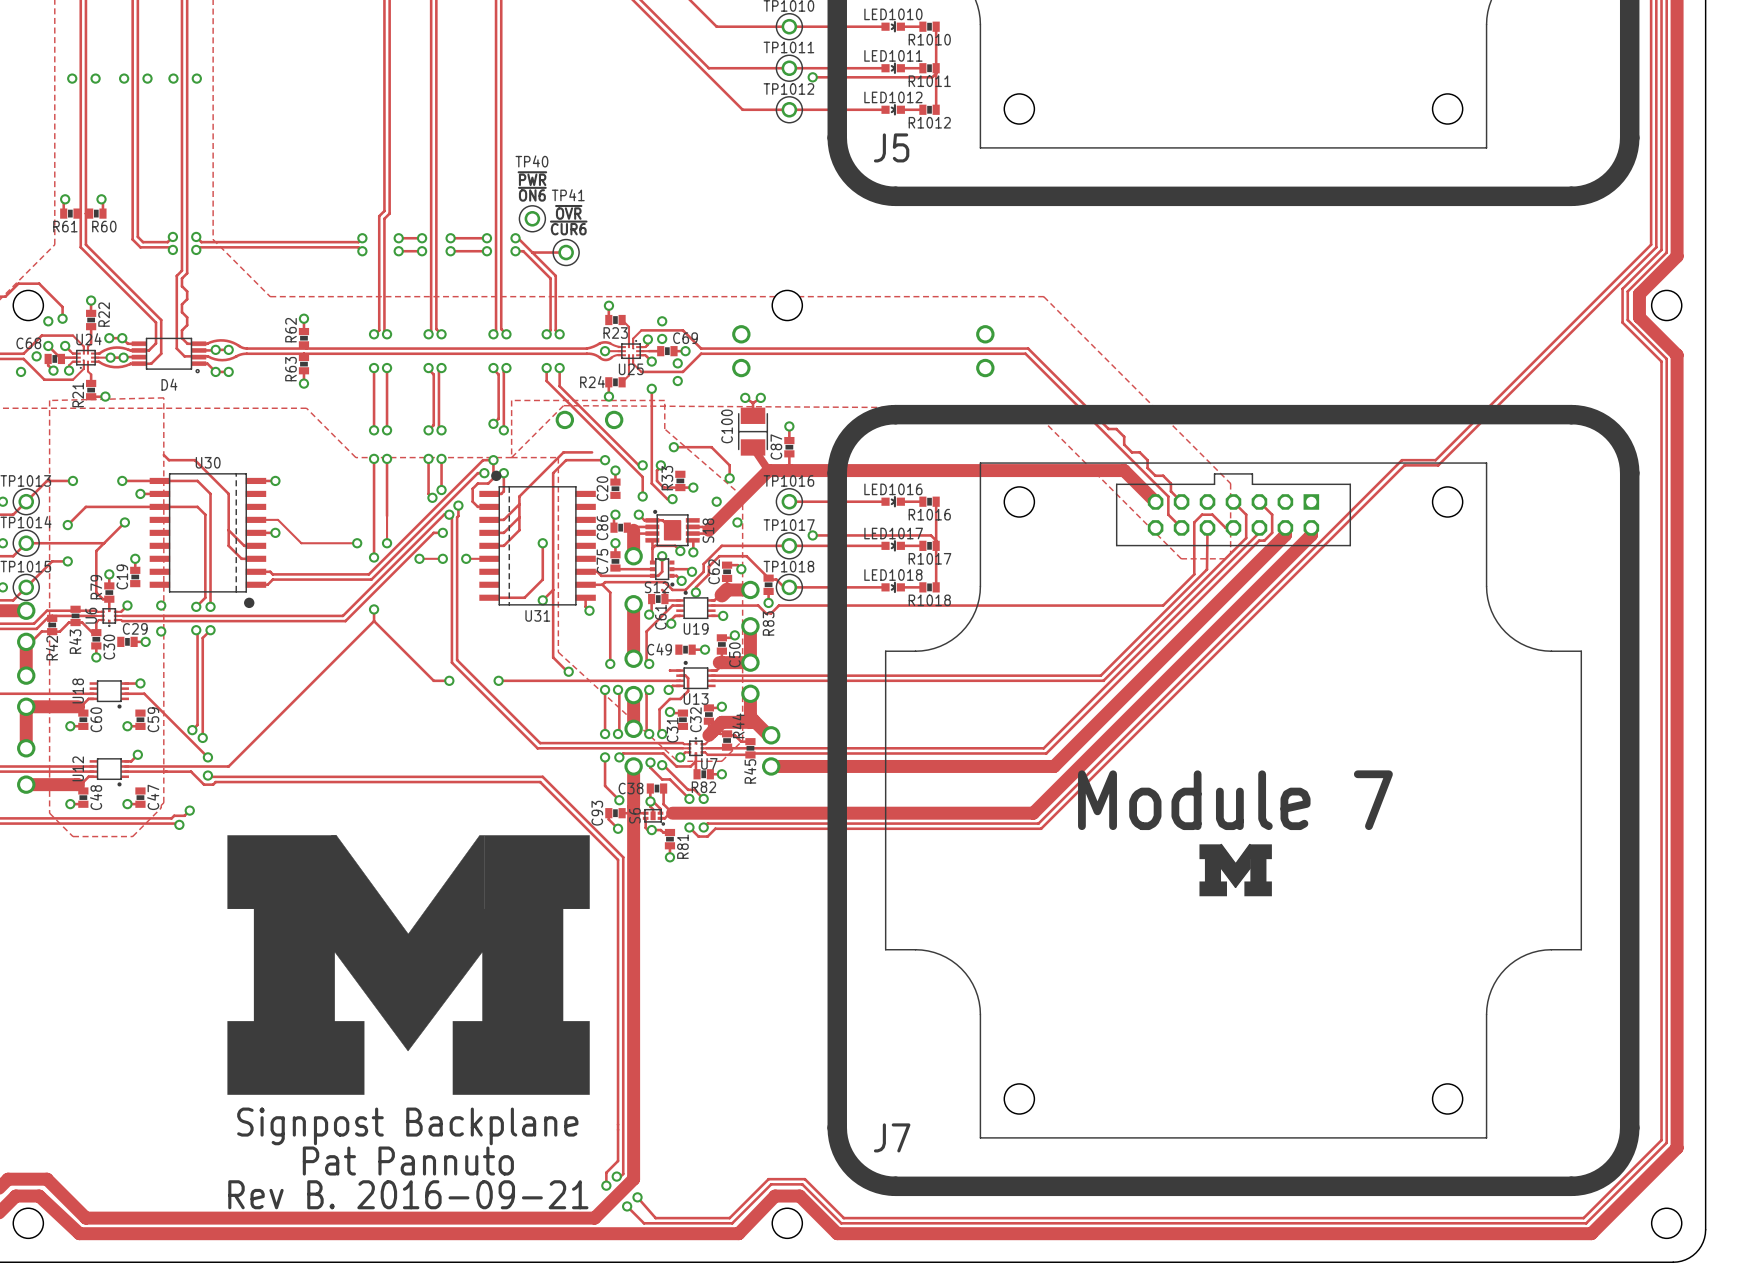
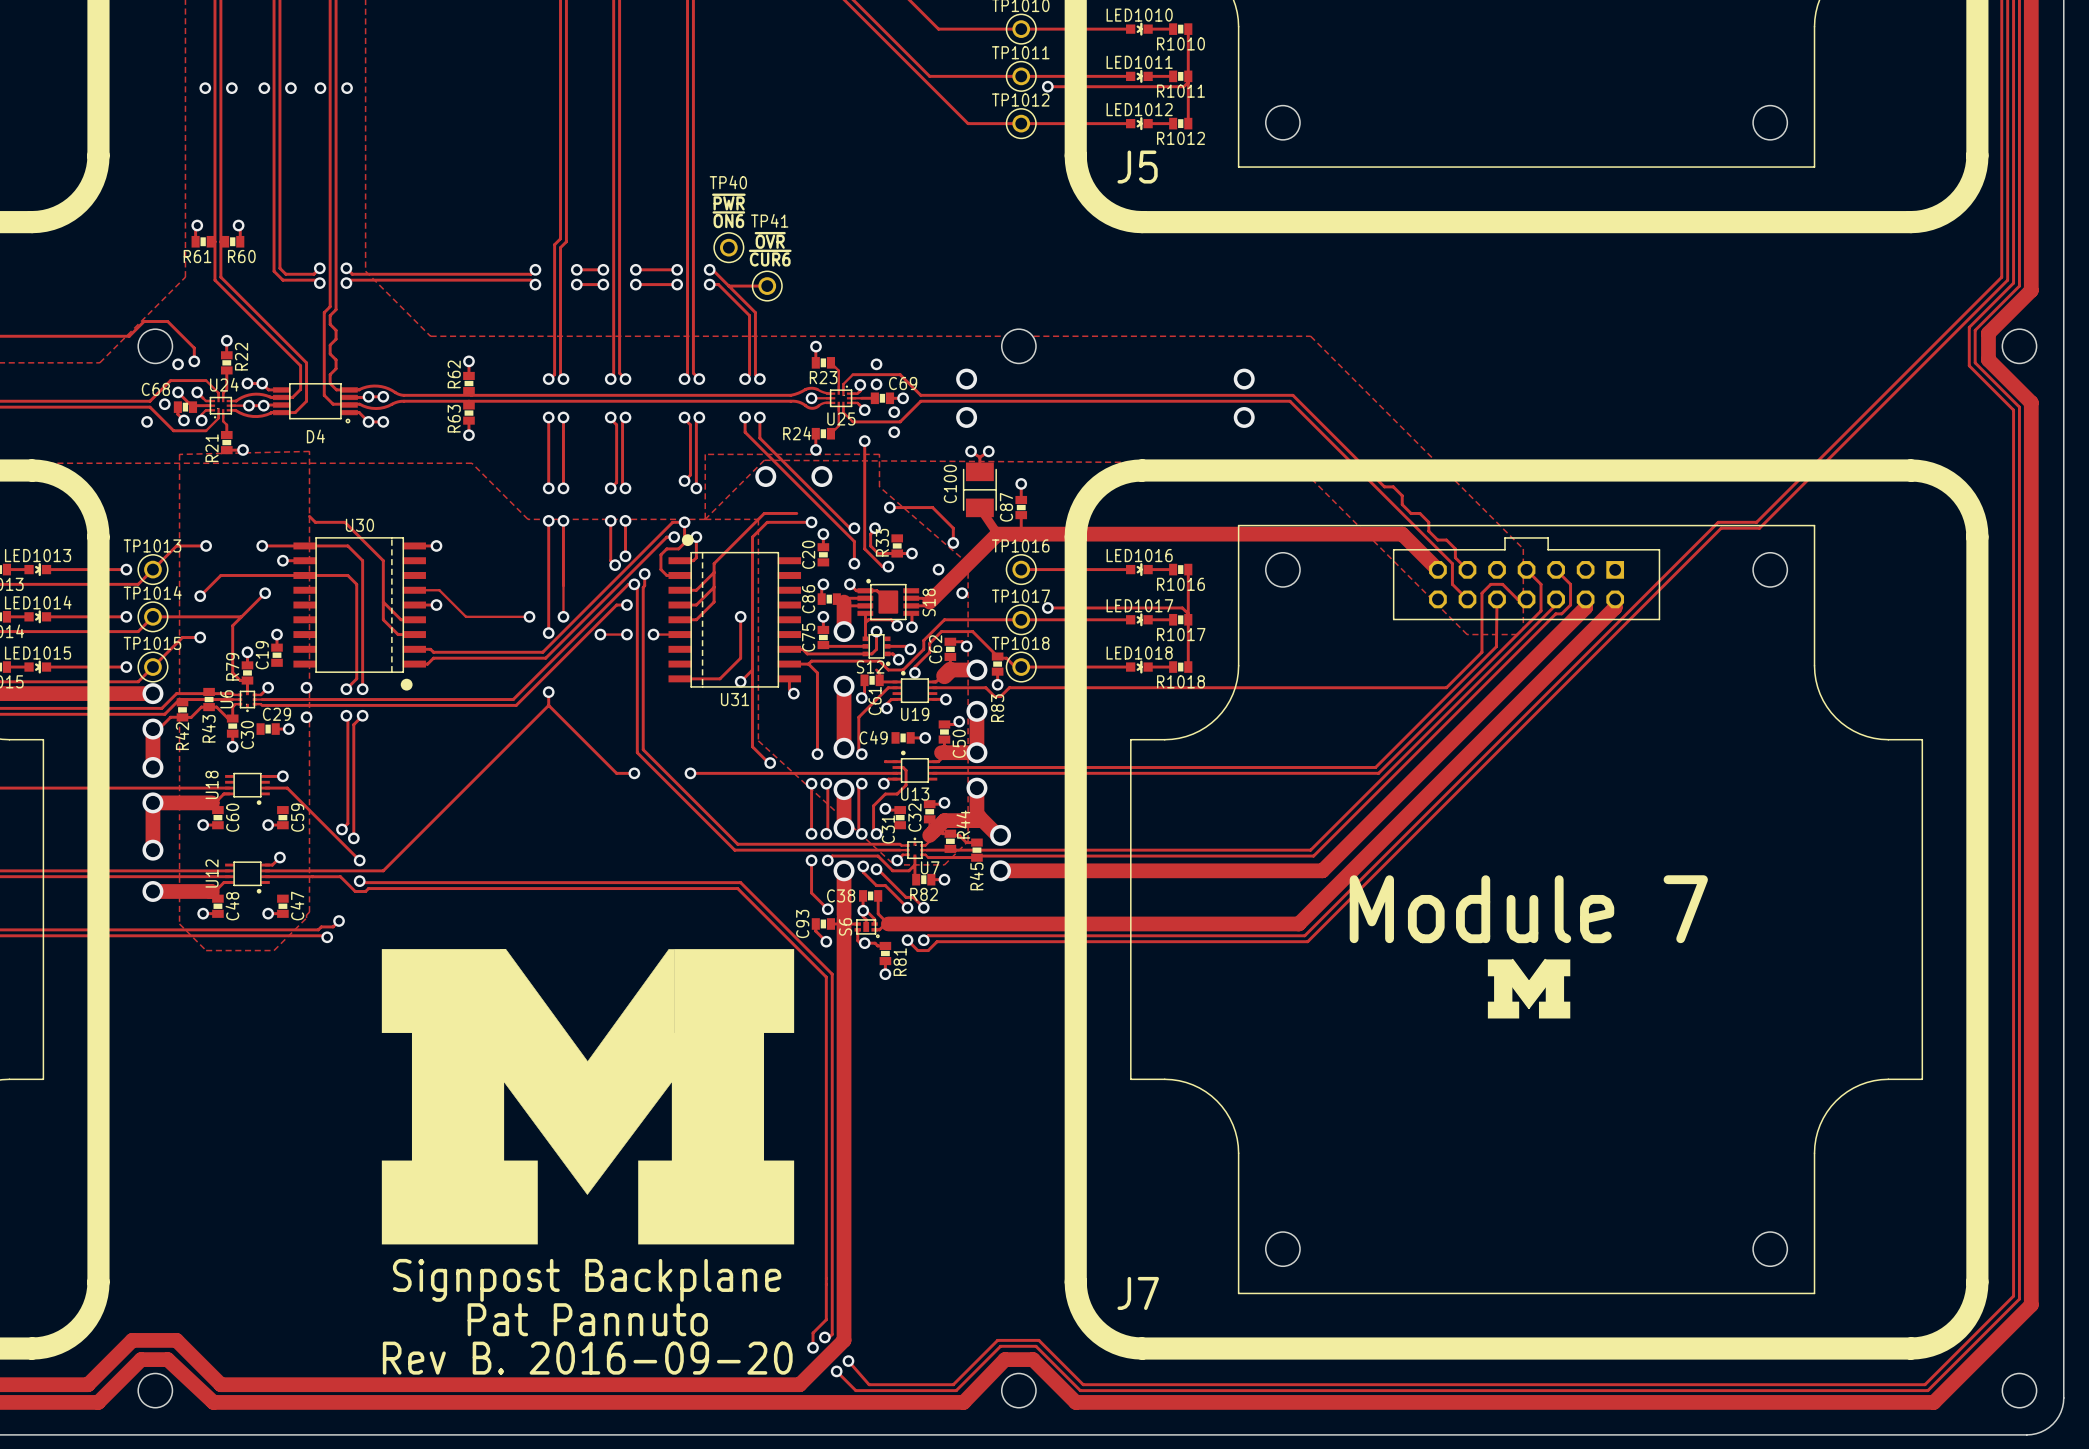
text: Rev B. 2016-09-21 (408, 1194) -> Rev B. 2016-09-20 (587, 1358)

